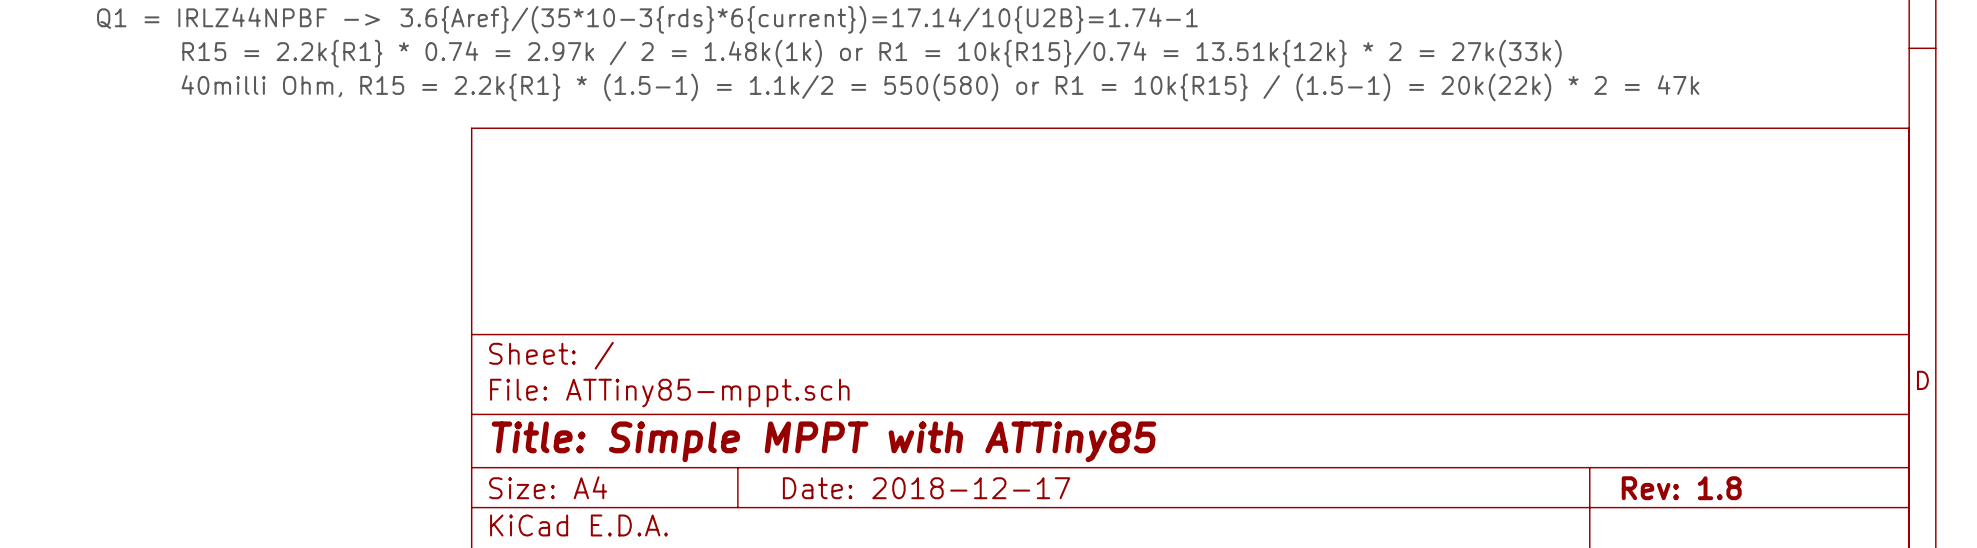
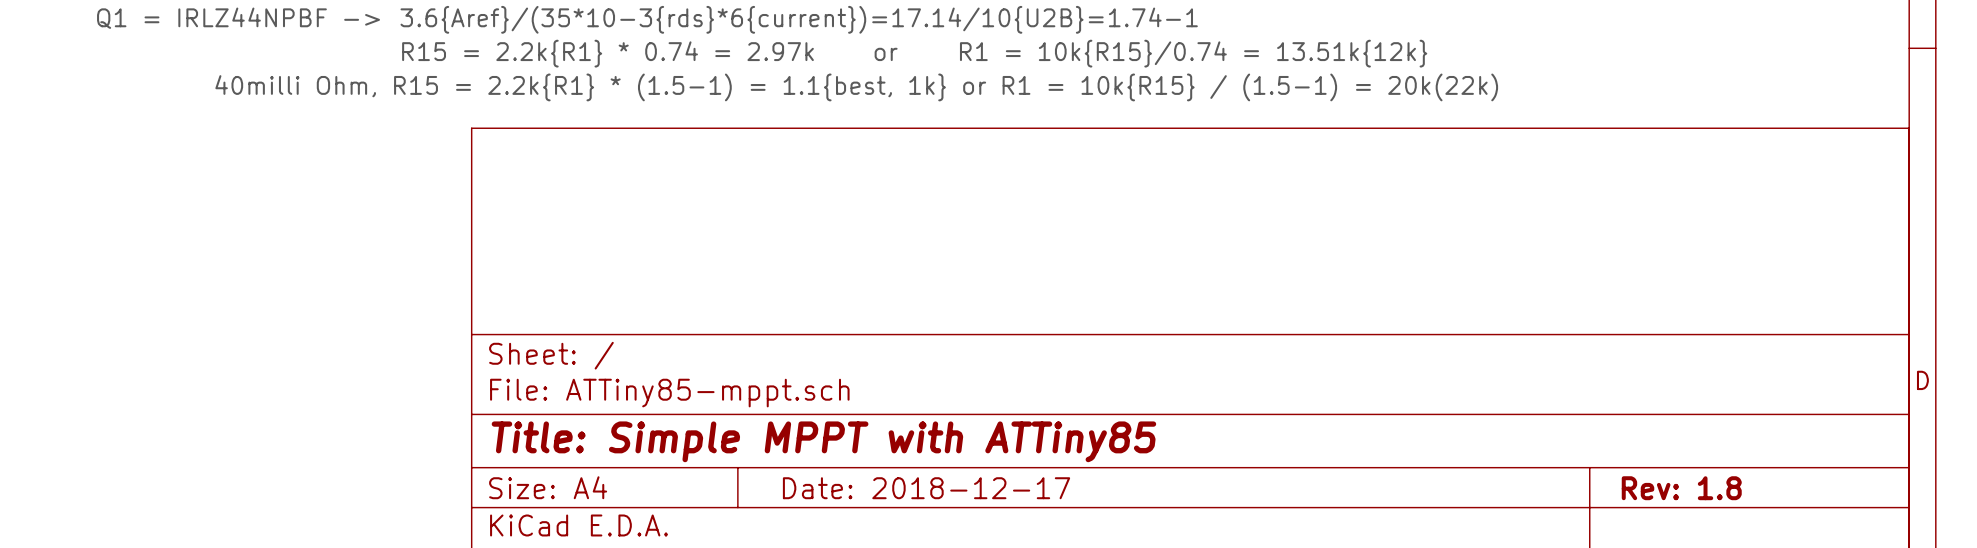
text: none -> R15 = 2.2k{R1} * 0.74 = 2.97k (607, 53)
text: R15 = 2.2k{R1} * 0.74 = 2.97k / 2 = 1.48k(1k) or R1 = 10k{R15}/0.74 = 13.51k{12k} * 2 = 27k(33k) (872, 53) -> none
text: none -> R1 = 10k{R15}/0.74 = 13.51k{12k} (1193, 53)
text: none -> or (886, 54)
text: 40milli Ohm, R15 = 2.2k{R1} * (1.5-1) = 1.1k/2 = 550(580) or R1 = 10k{R15} / (1.5-1) = 20k(22k) * 2 = 47k (940, 87) -> 40milli Ohm, R15 = 2.2k{R1} * (1.5-1) = 1.1{best, 1k} or R1 = 10k{R15} / (1.5-1) = 20k(22k) (856, 87)

